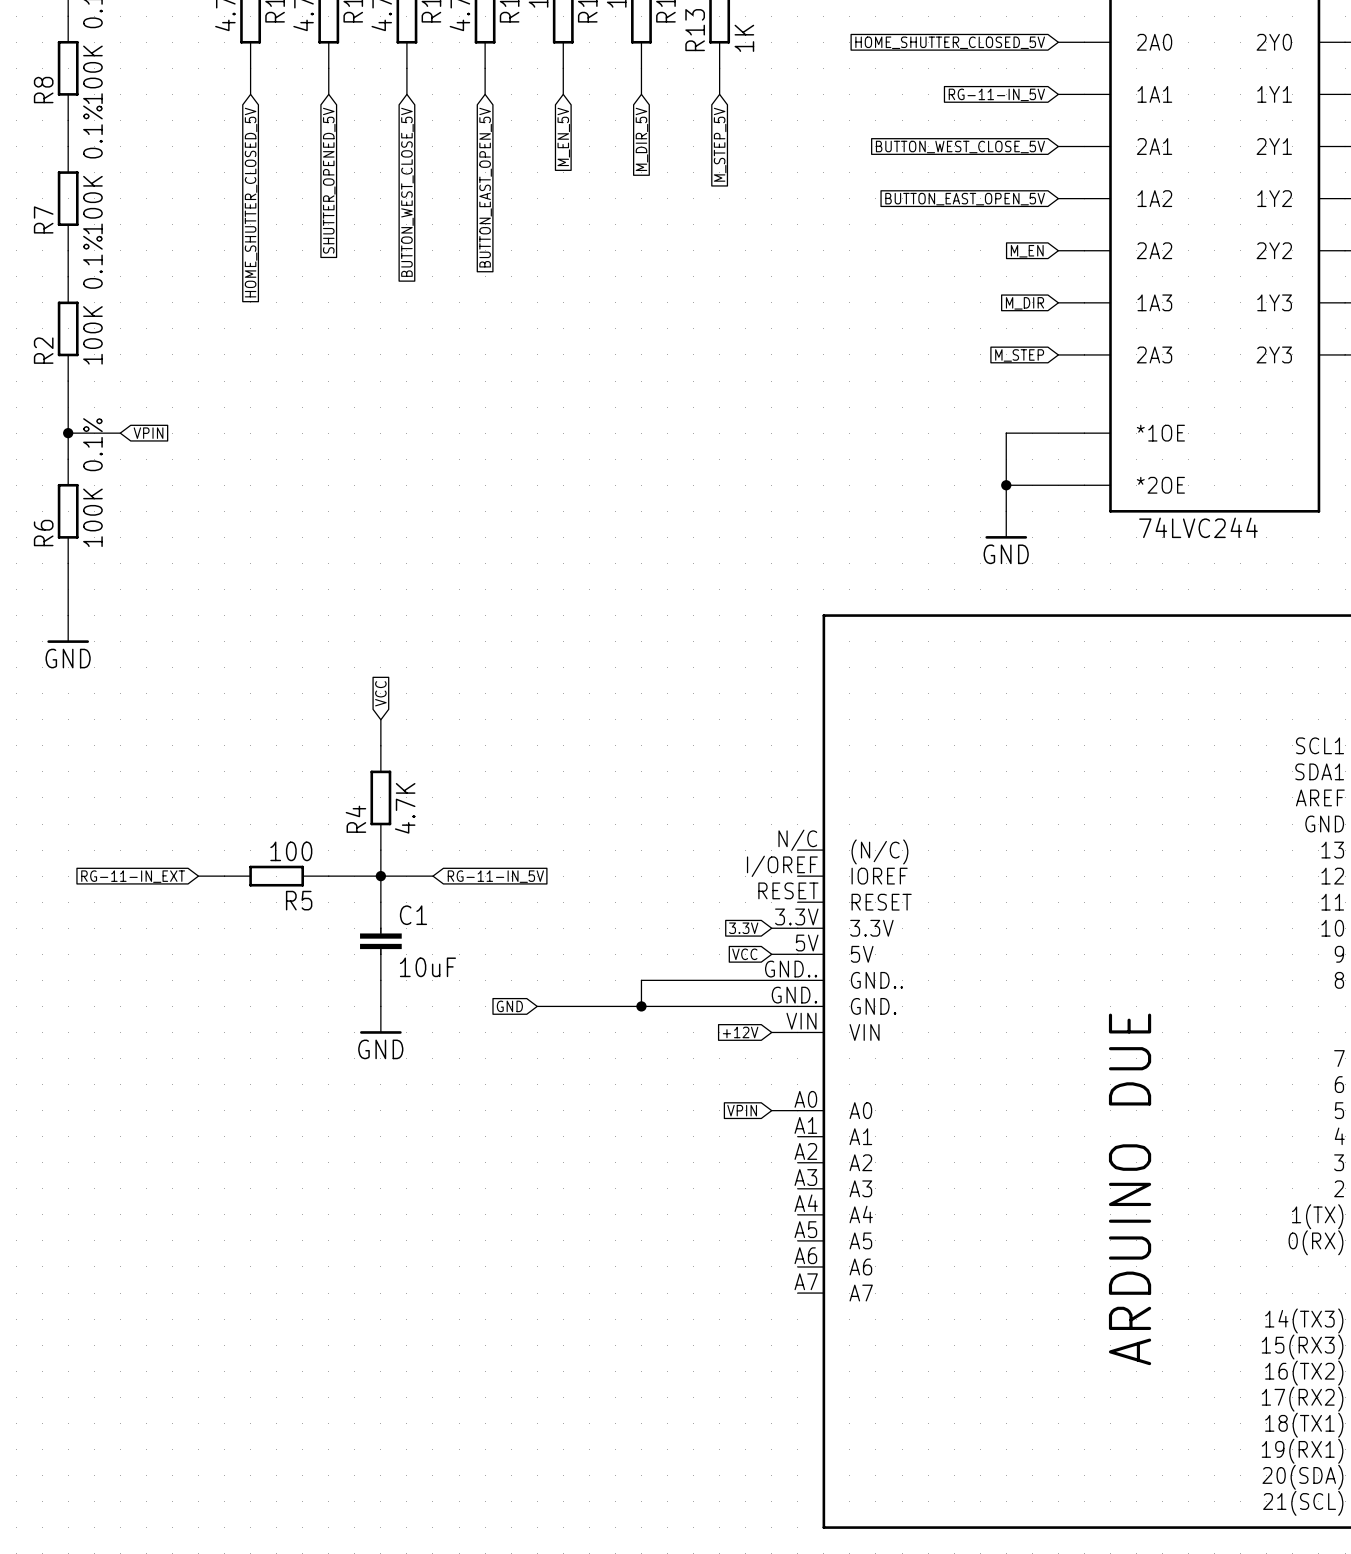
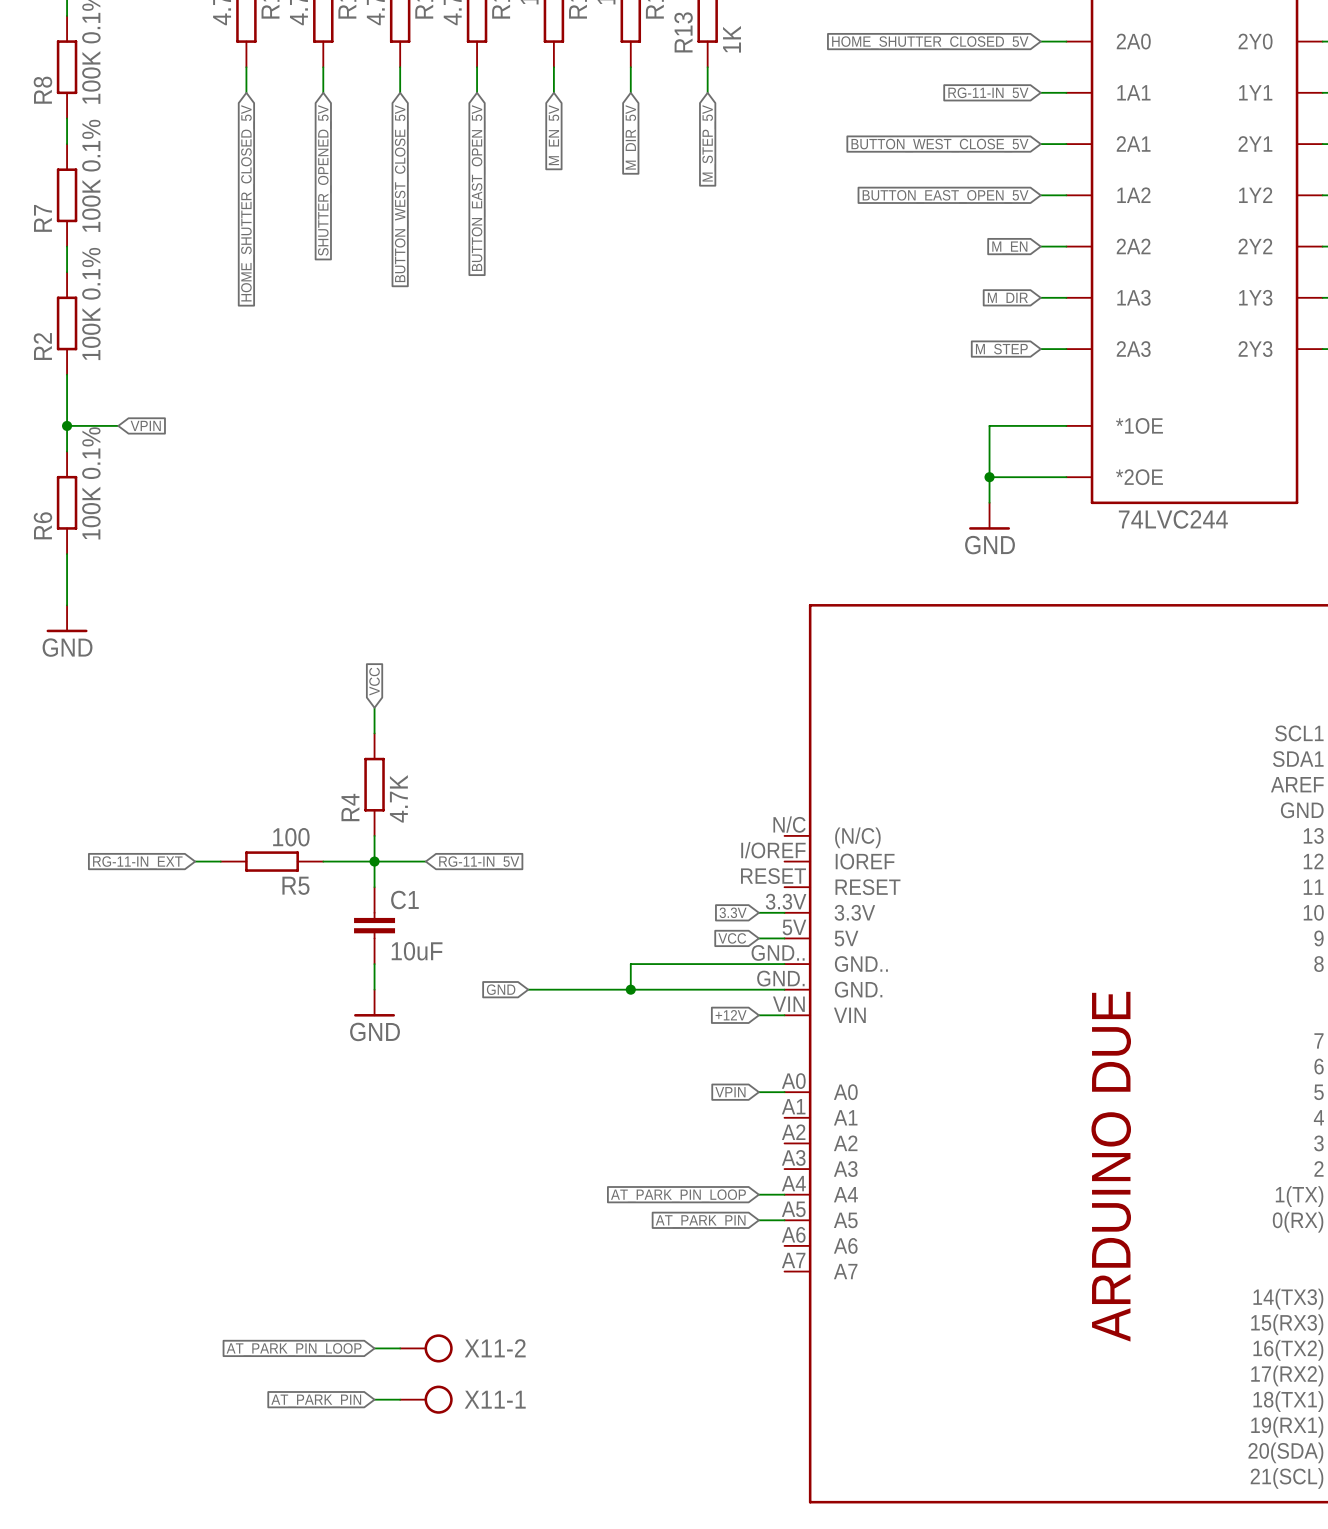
wire: none -> (758, 1194) (784, 1194)
global label: none -> AT_PARK_PIN_LOOP (678, 1196)
wire: none -> (758, 1220) (784, 1220)
global label: none -> AT_PARK_PIN (700, 1221)
global label: none -> AT_PARK_PIN_LOOP (294, 1349)
wire: none -> (374, 1348) (400, 1348)
X11-2: none -> (426, 1348)
global label: none -> AT_PARK_PIN (316, 1401)
wire: none -> (374, 1399) (400, 1399)
X11-1: none -> (426, 1399)

